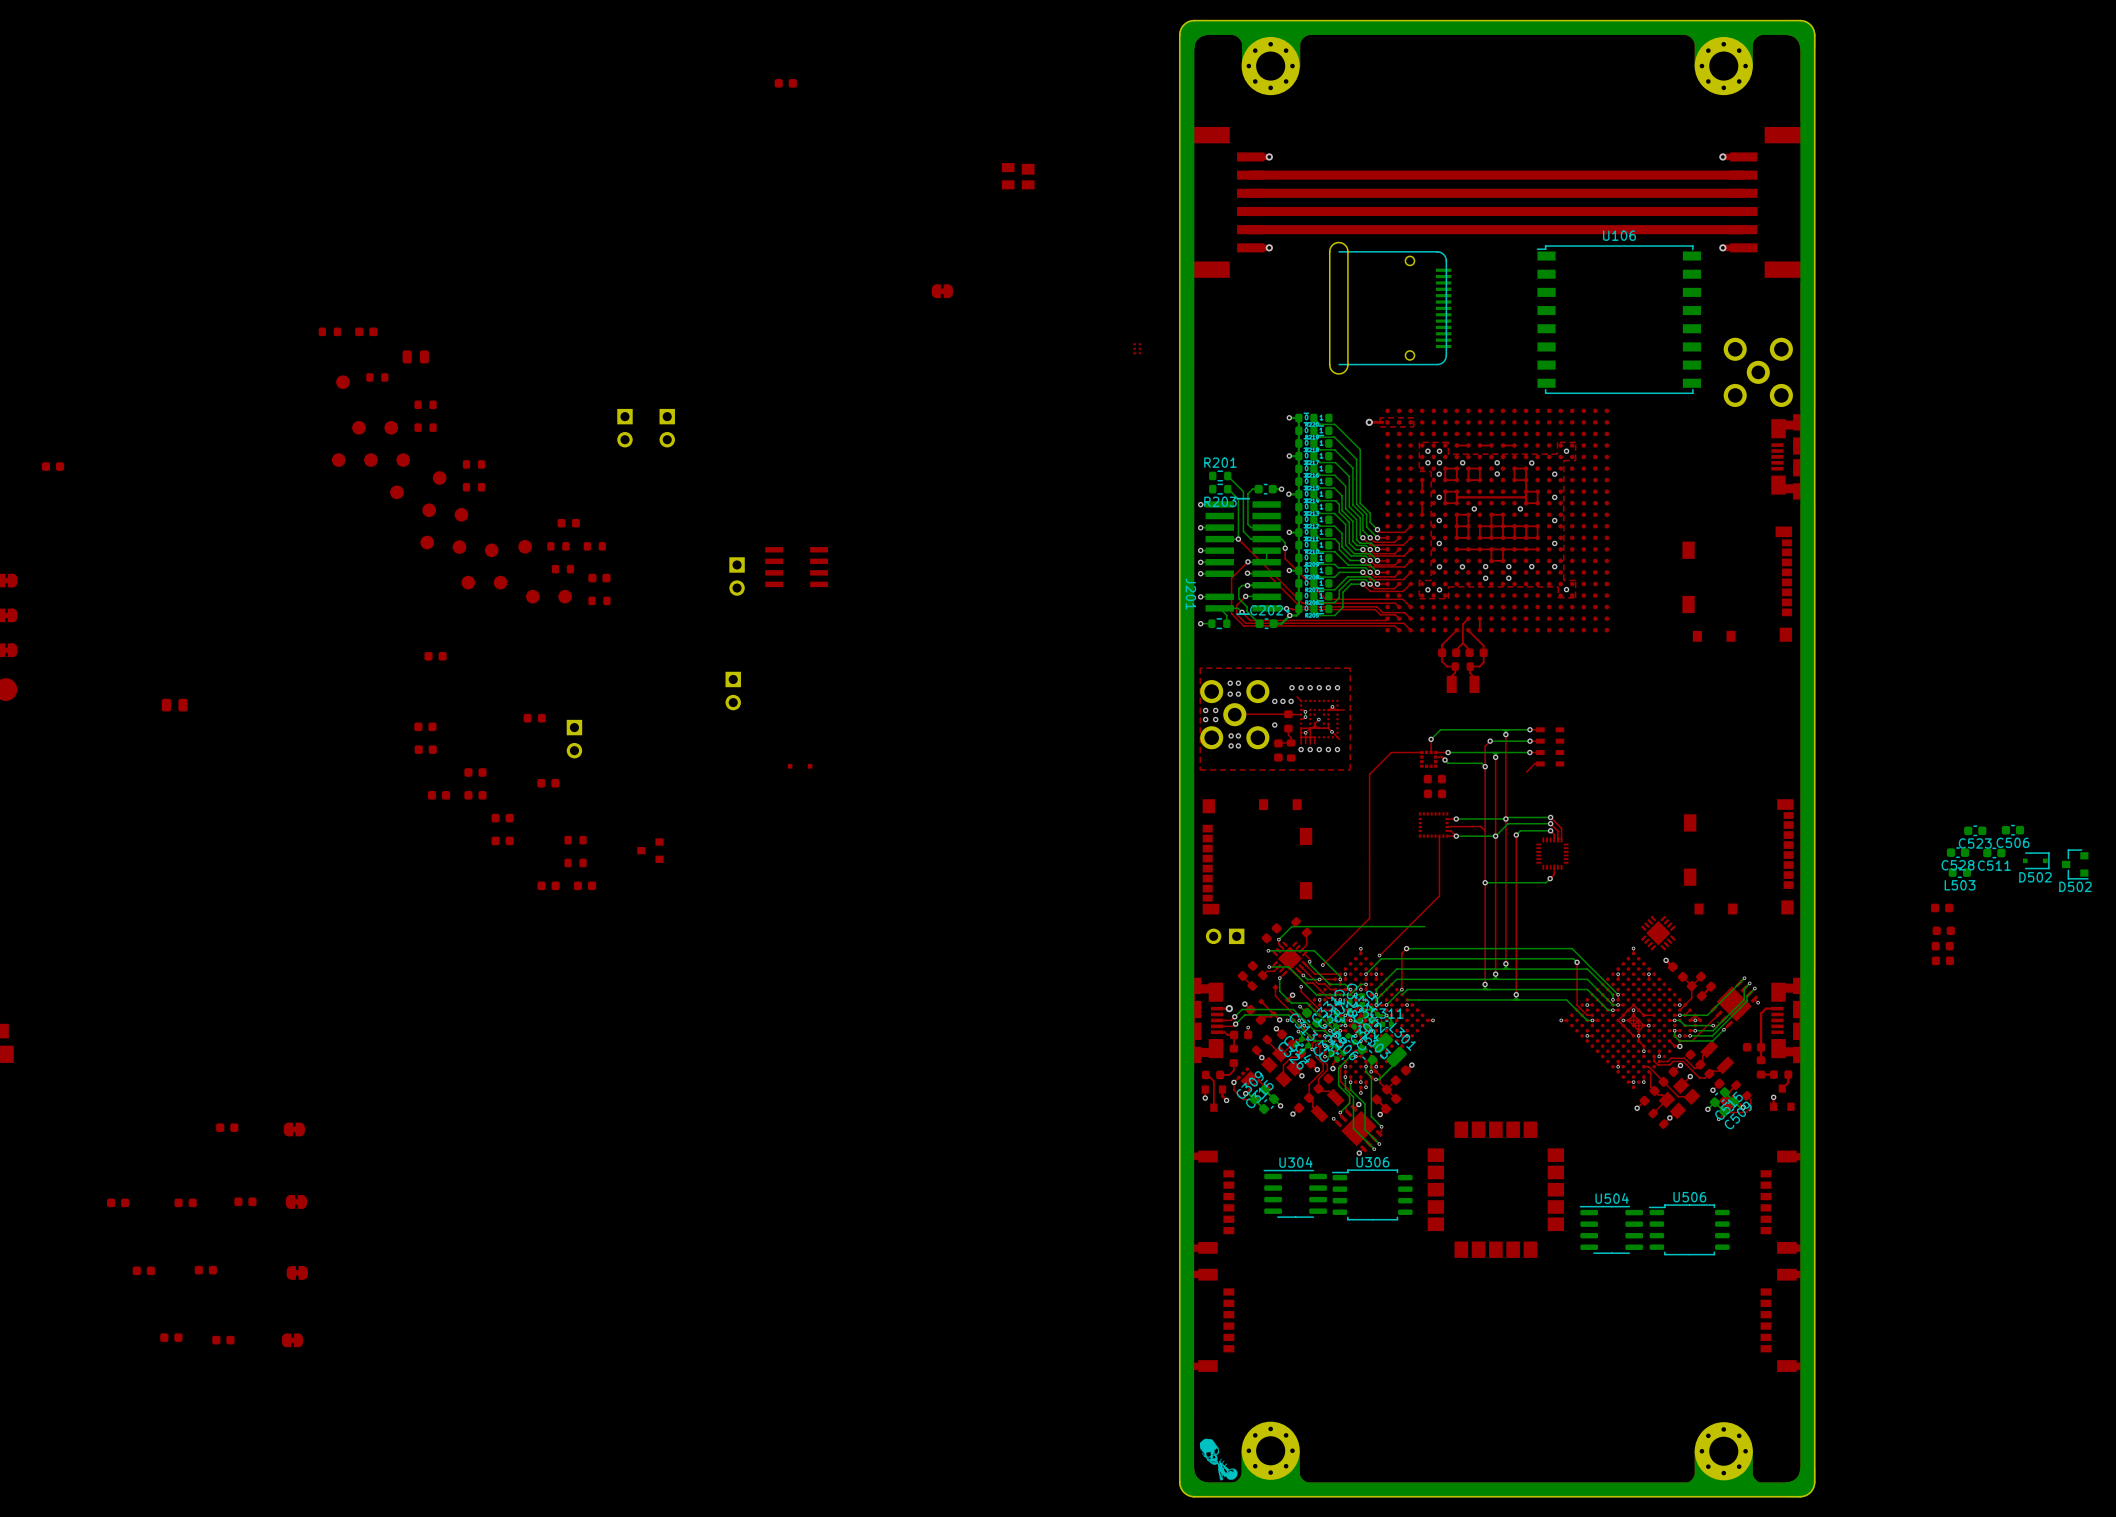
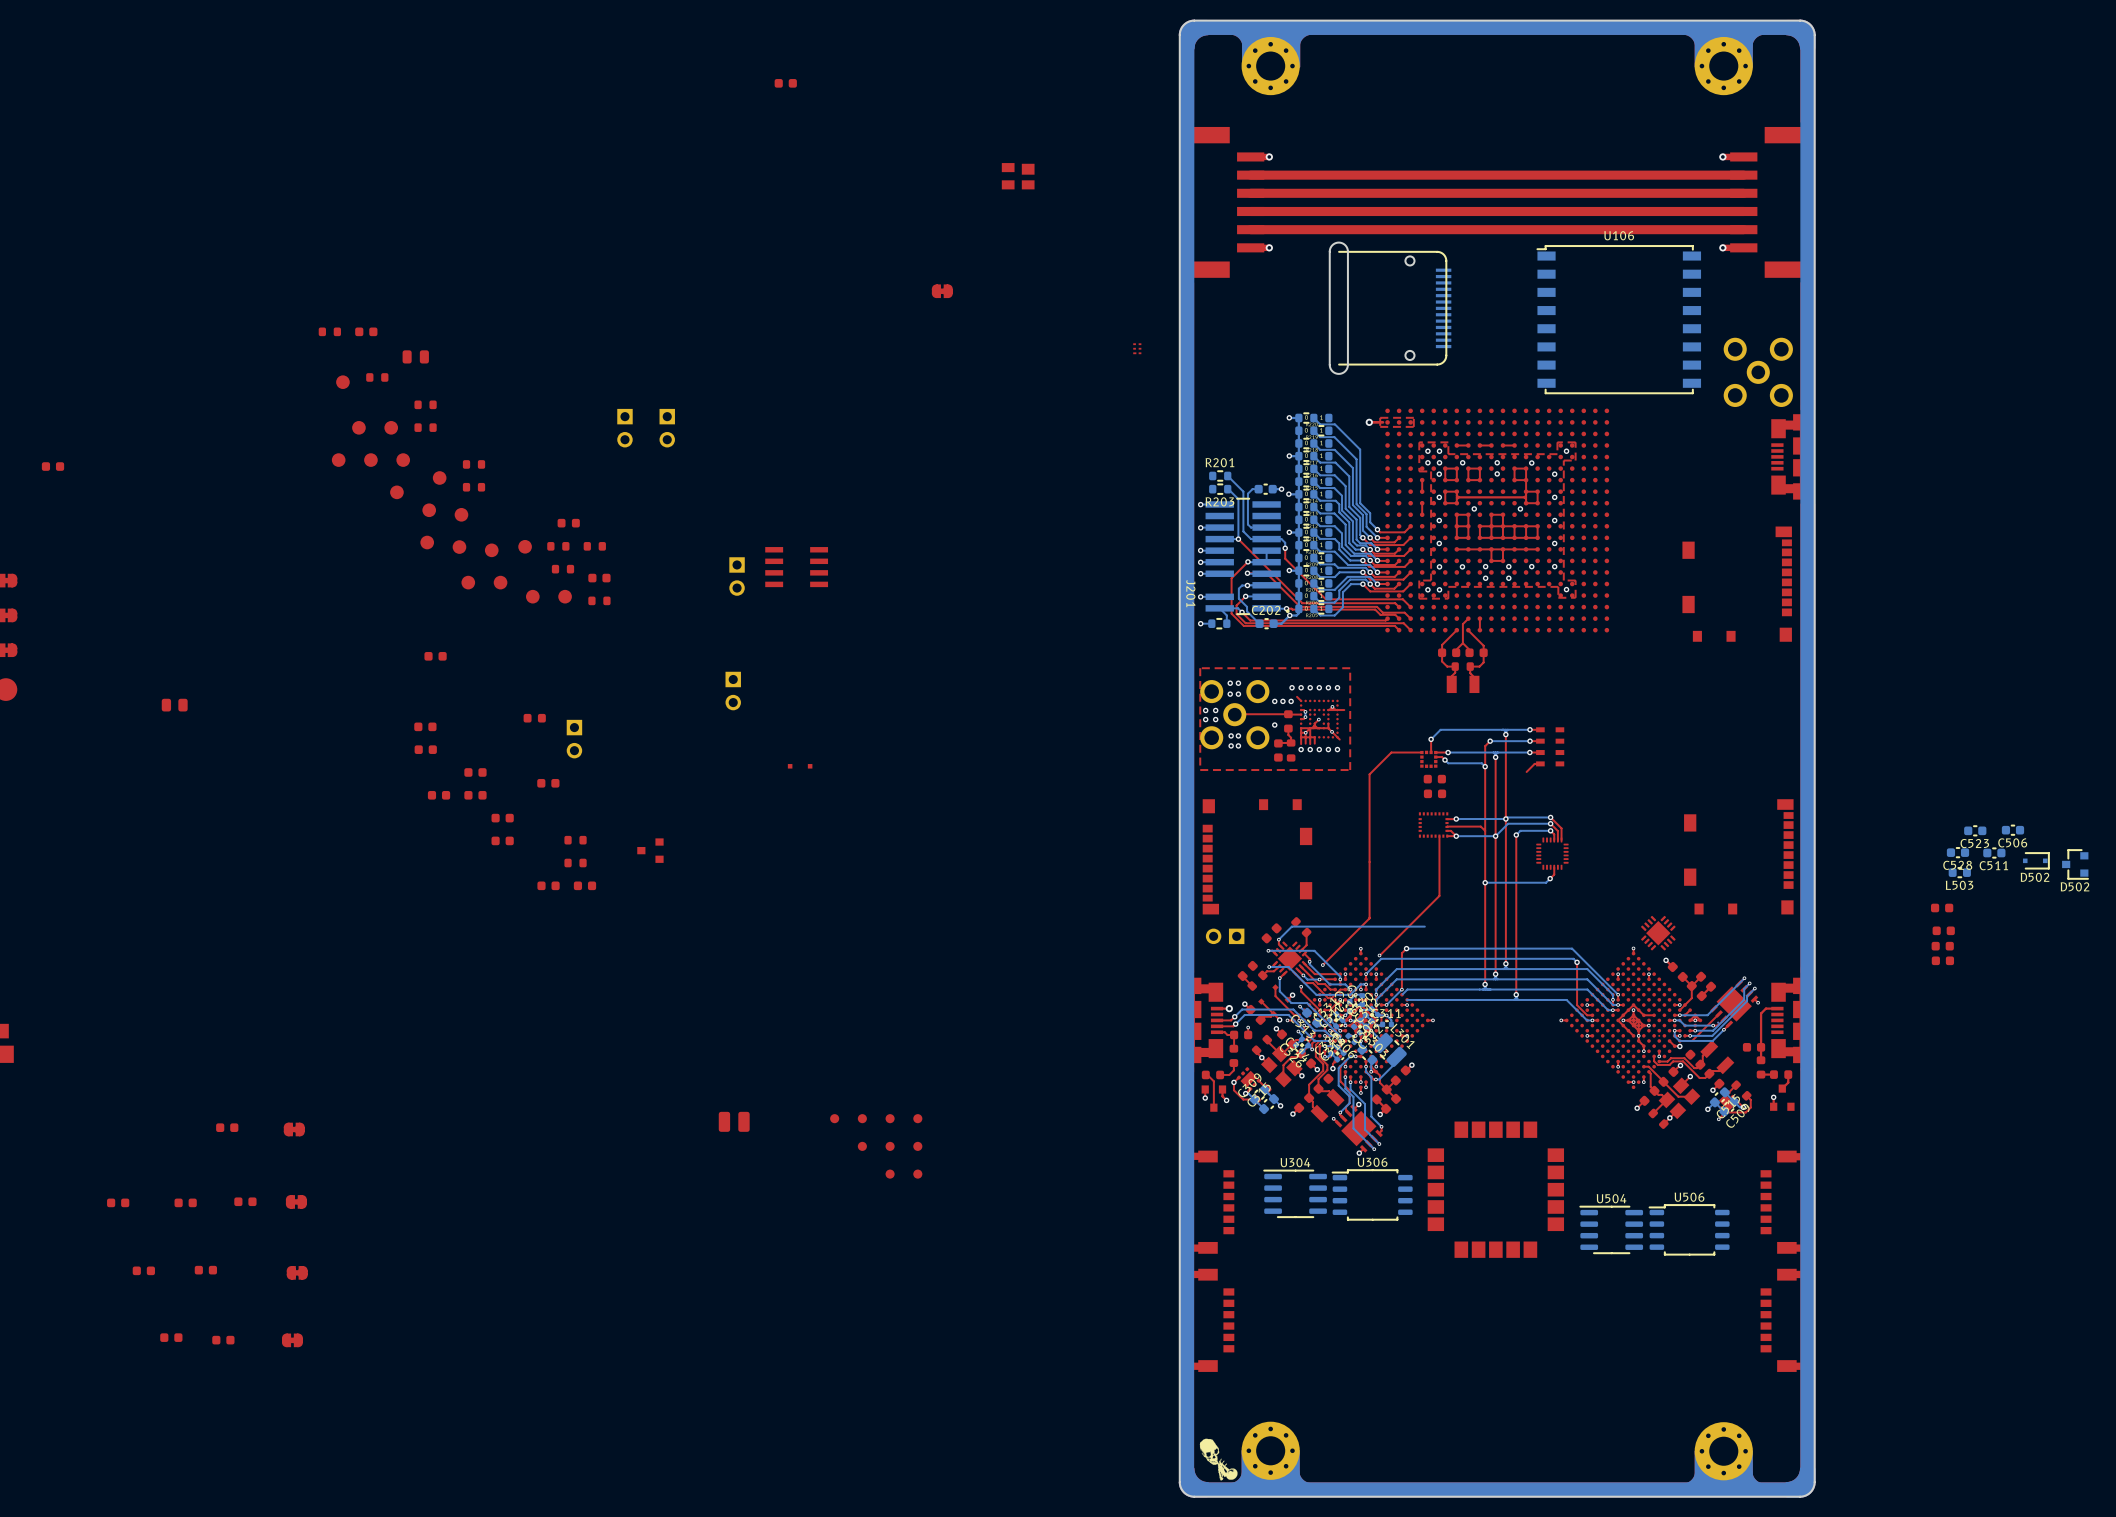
part: none -> (834, 1118)
part: none -> (862, 1118)
part: none -> (890, 1118)
part: none -> (917, 1118)
part: none -> (734, 1121)
part: none -> (862, 1146)
part: none -> (890, 1146)
part: none -> (917, 1146)
part: none -> (890, 1174)
part: none -> (917, 1174)

